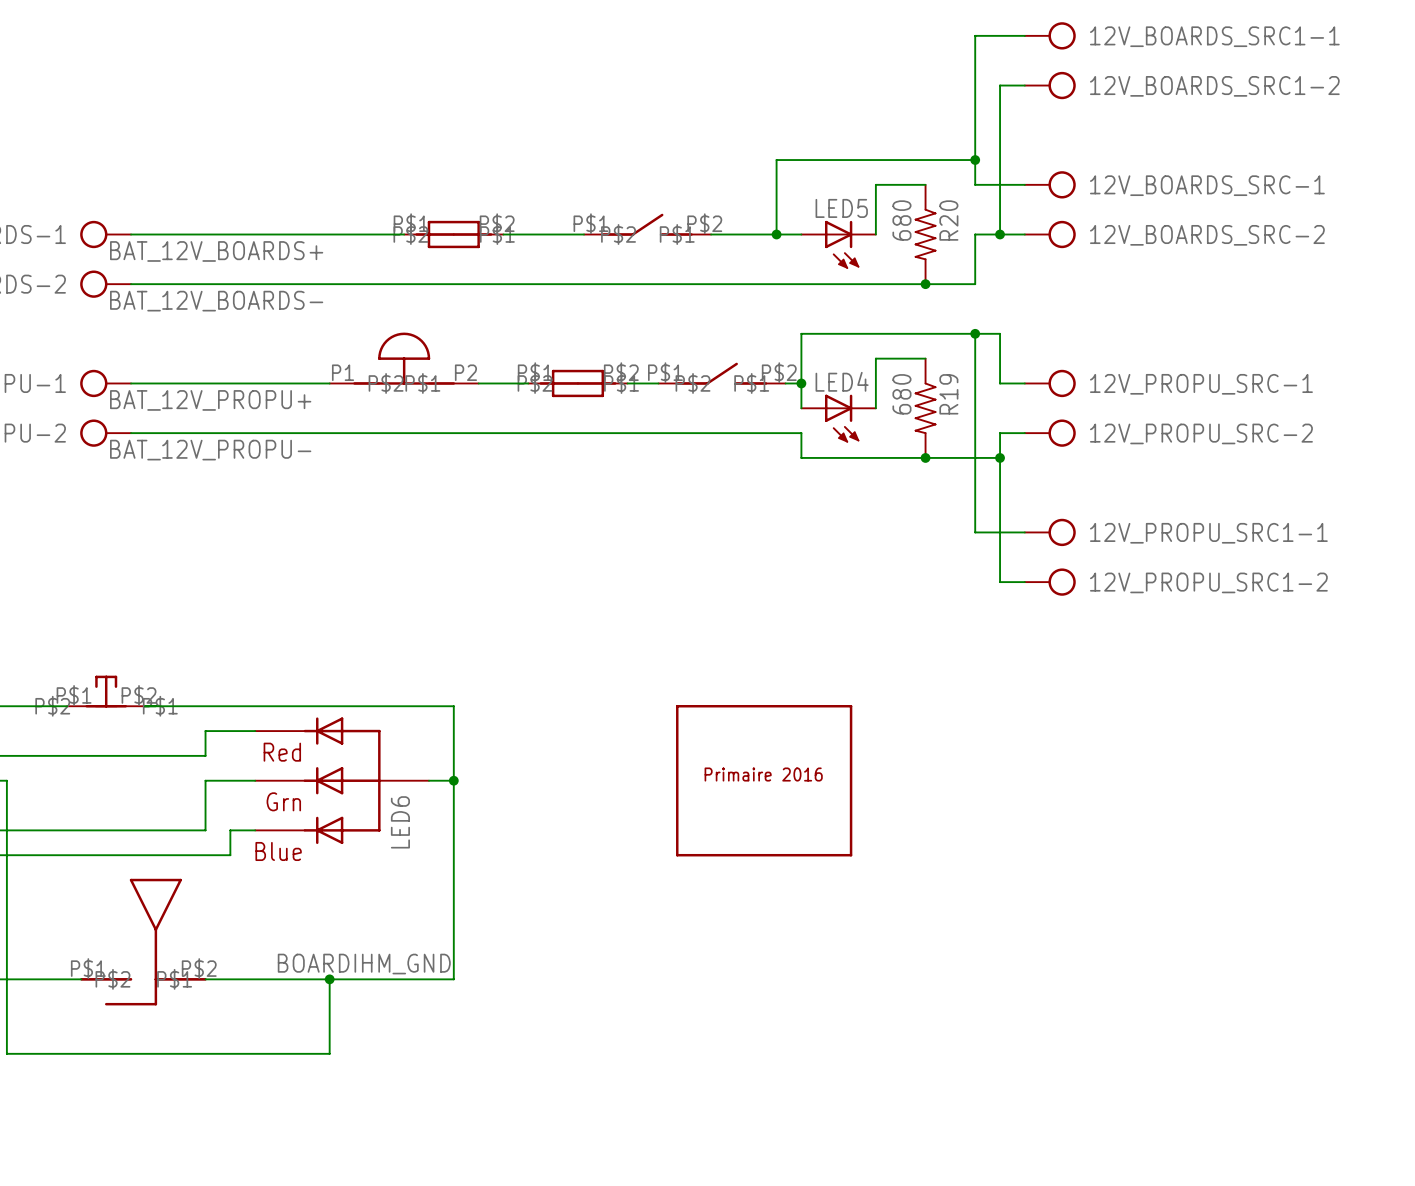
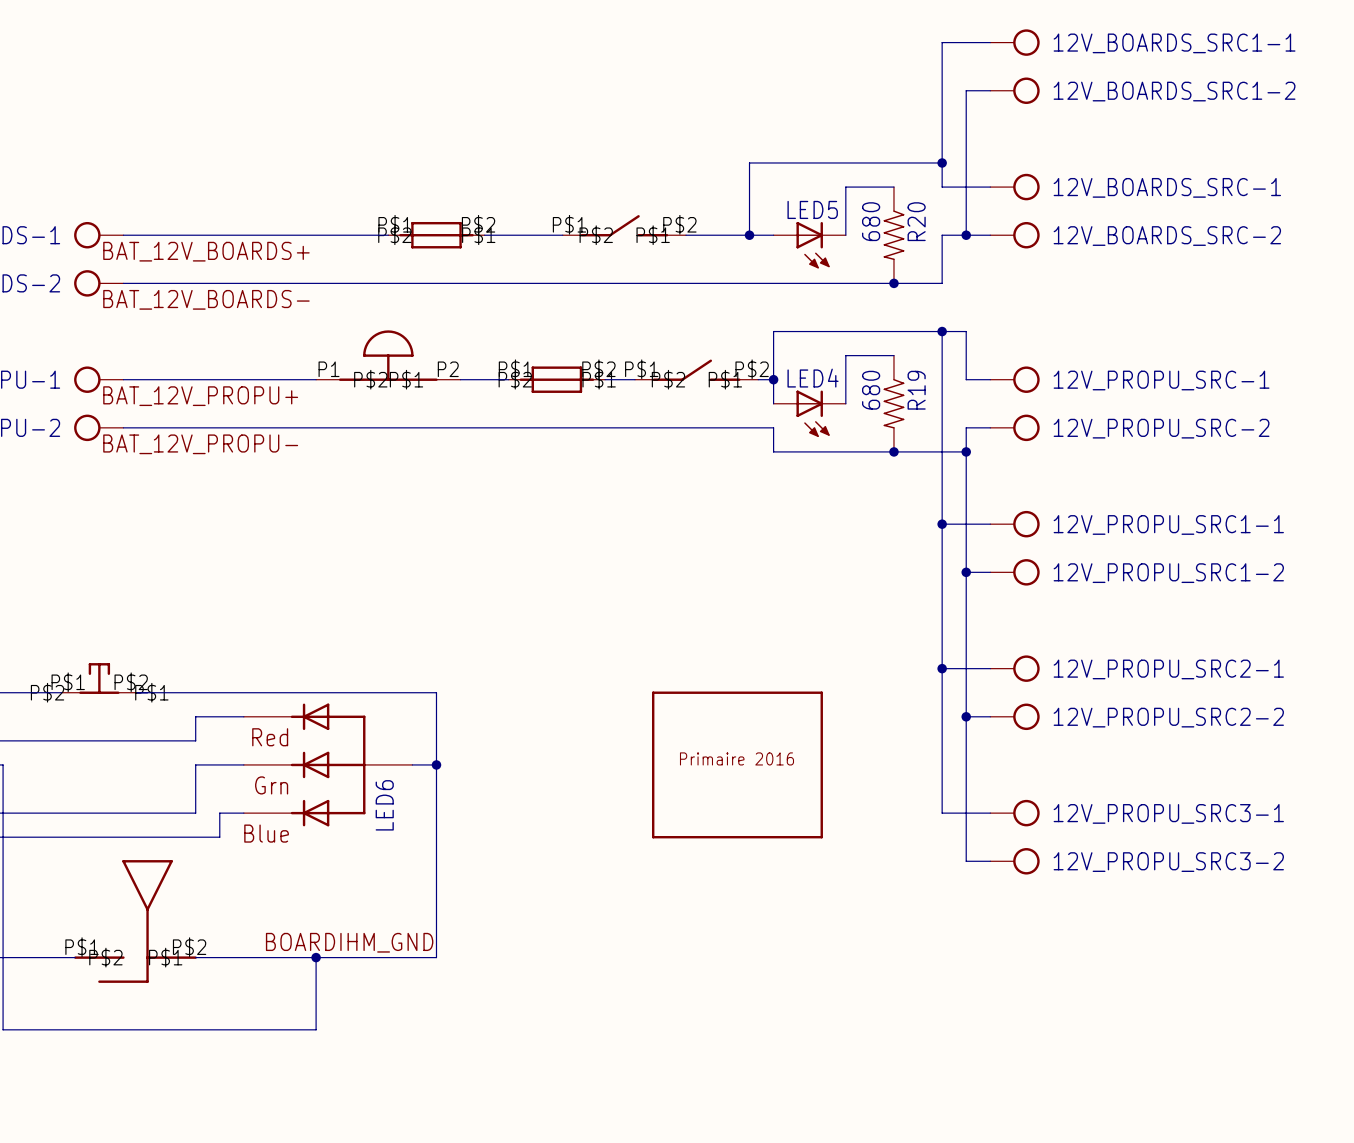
wire: none -> (942, 524) (942, 813) (990, 813)
junction: none -> (942, 524)
wire: none -> (966, 572) (966, 861) (990, 861)
junction: none -> (966, 572)
wire: none -> (942, 668) (990, 668)
junction: none -> (942, 668)
12V_PROPU_SRC2-1: none -> (1014, 668)
wire: none -> (966, 716) (990, 716)
junction: none -> (966, 716)
12V_PROPU_SRC2-2: none -> (1014, 716)
12V_PROPU_SRC3-1: none -> (1014, 813)
12V_PROPU_SRC3-2: none -> (1014, 861)

